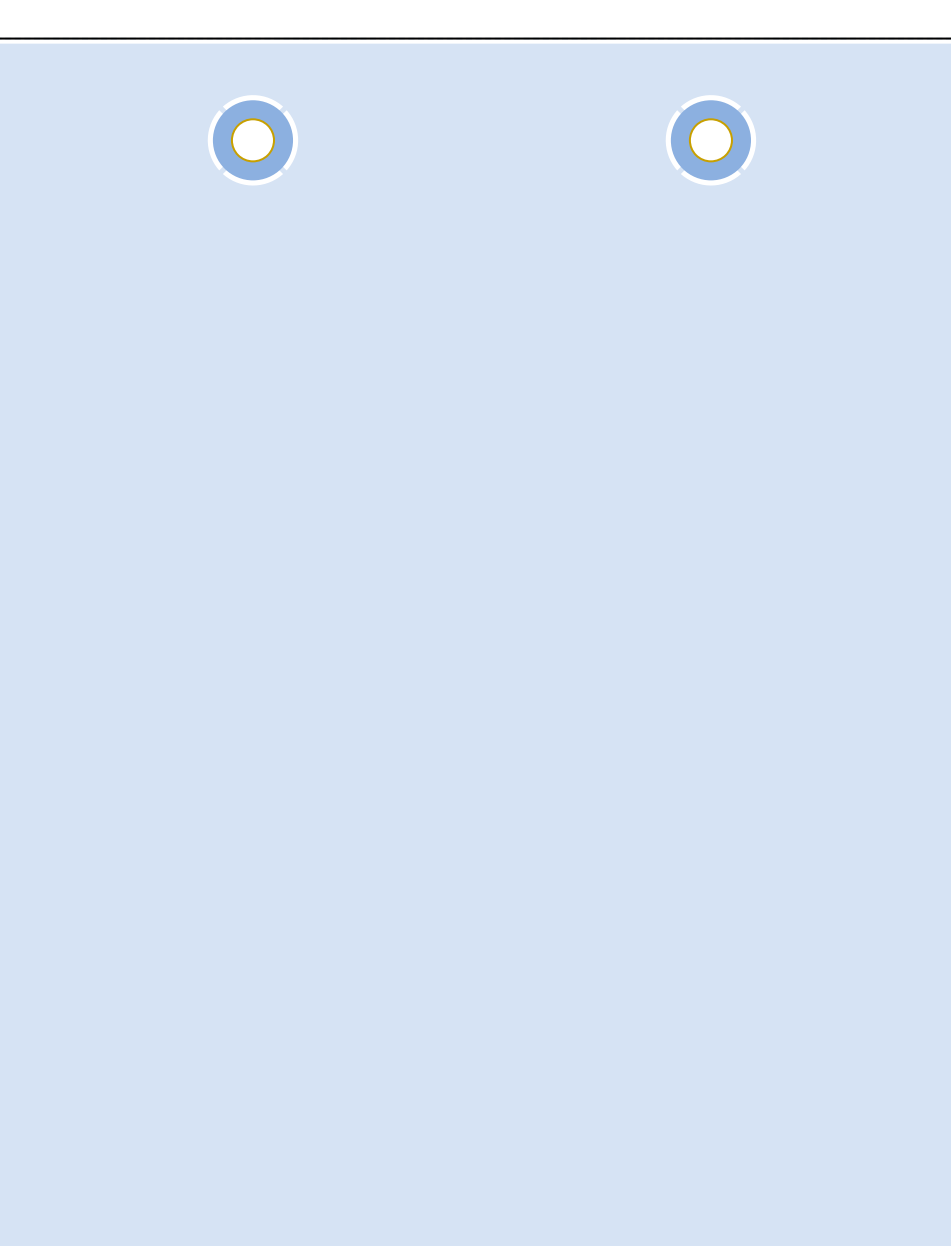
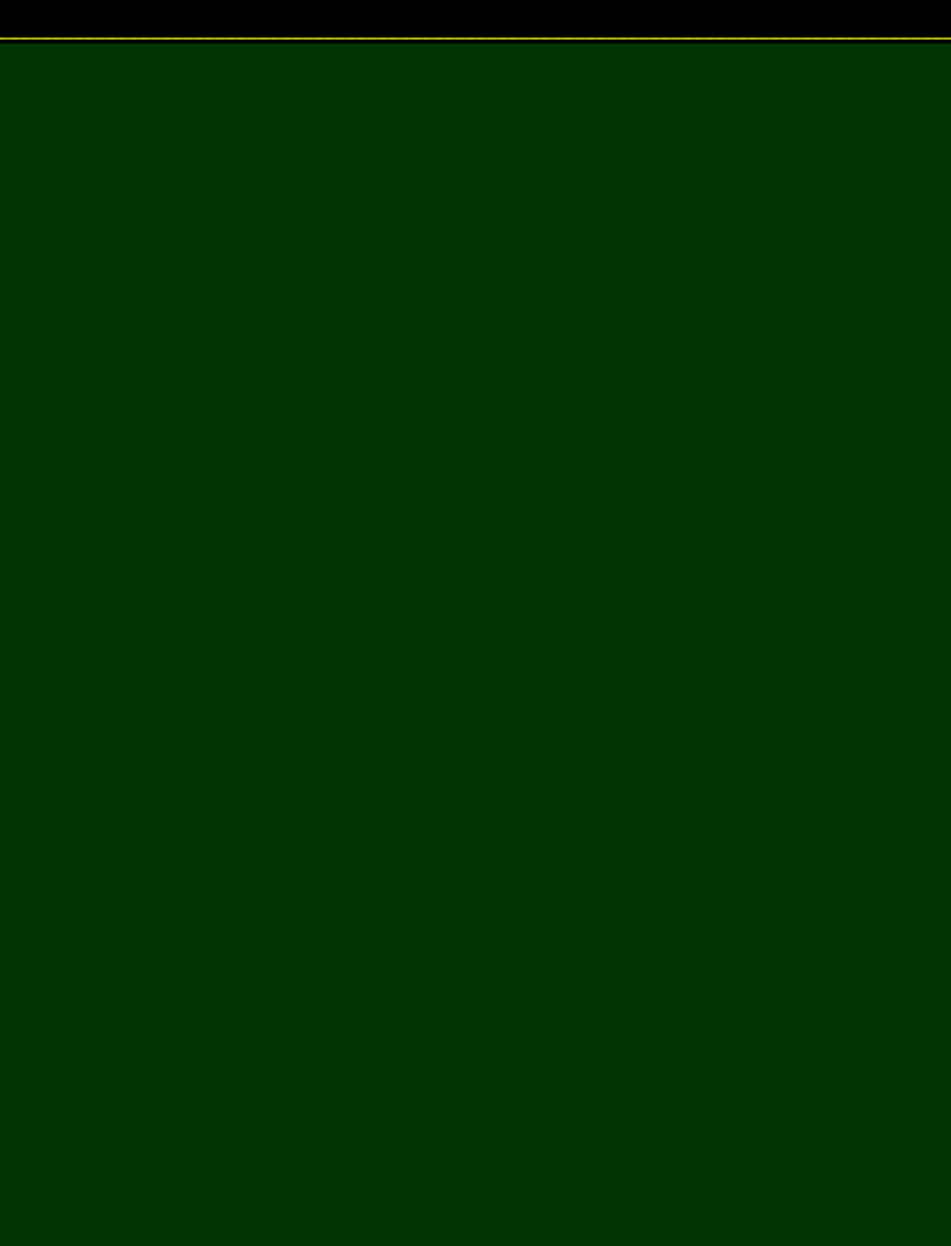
part: (252, 140) -> none
part: (710, 140) -> none

